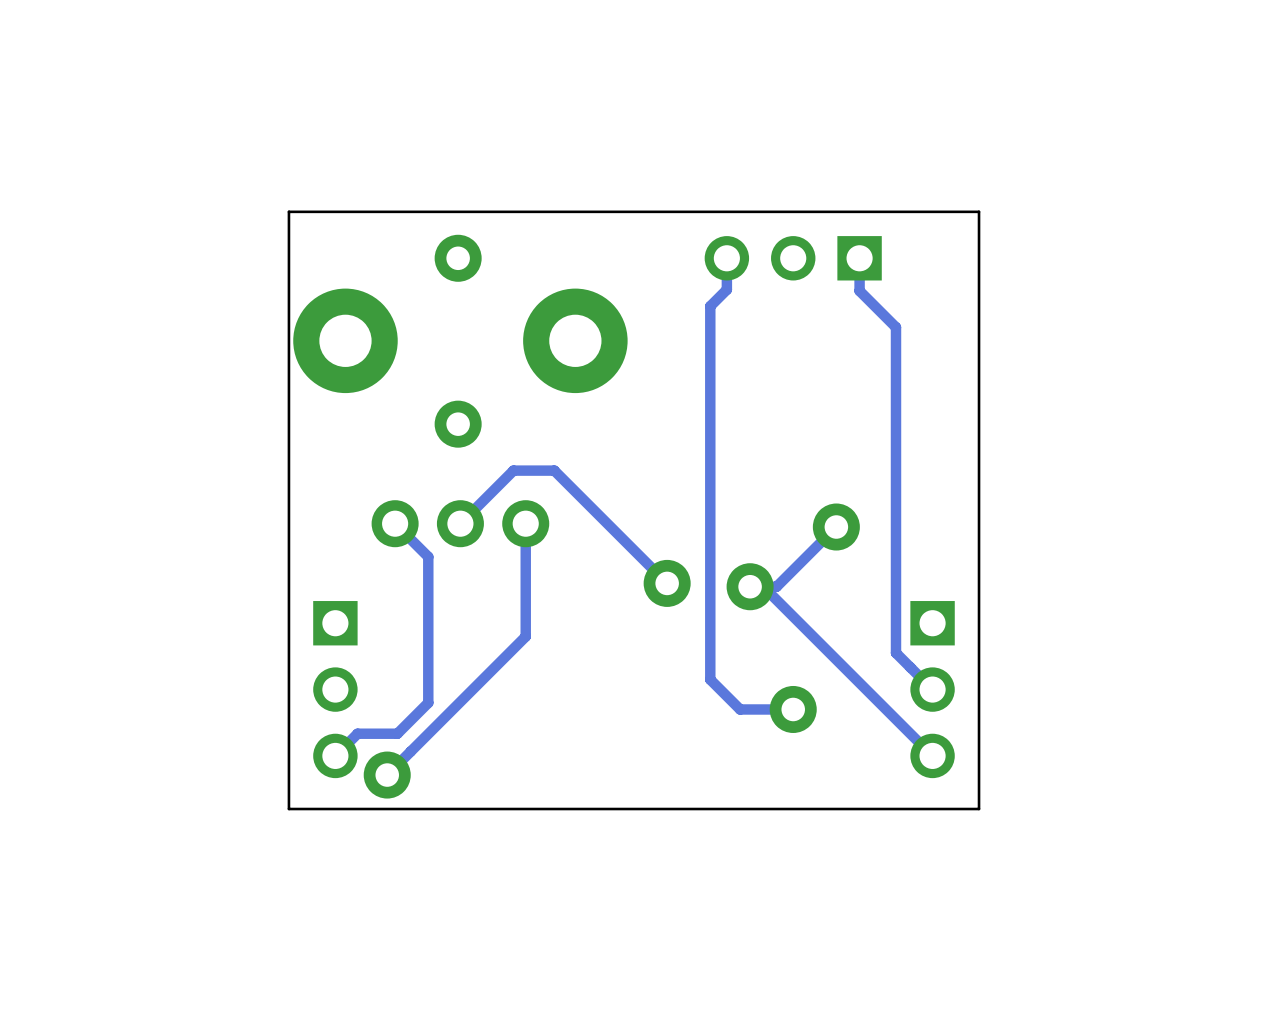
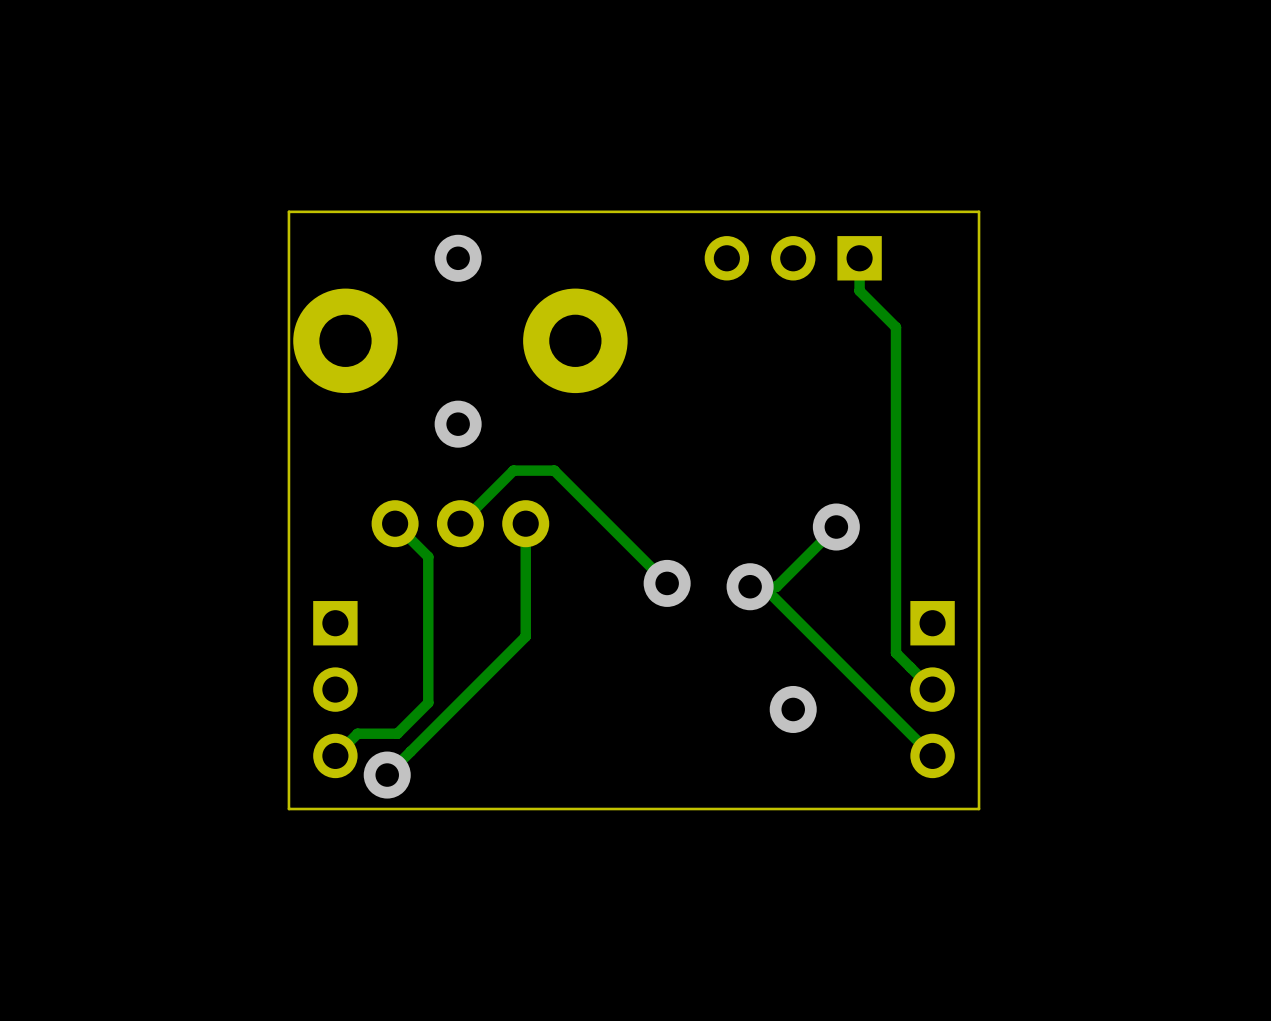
track: (726, 258) (726, 289) (710, 306) (710, 679) (740, 709) (793, 709) -> none

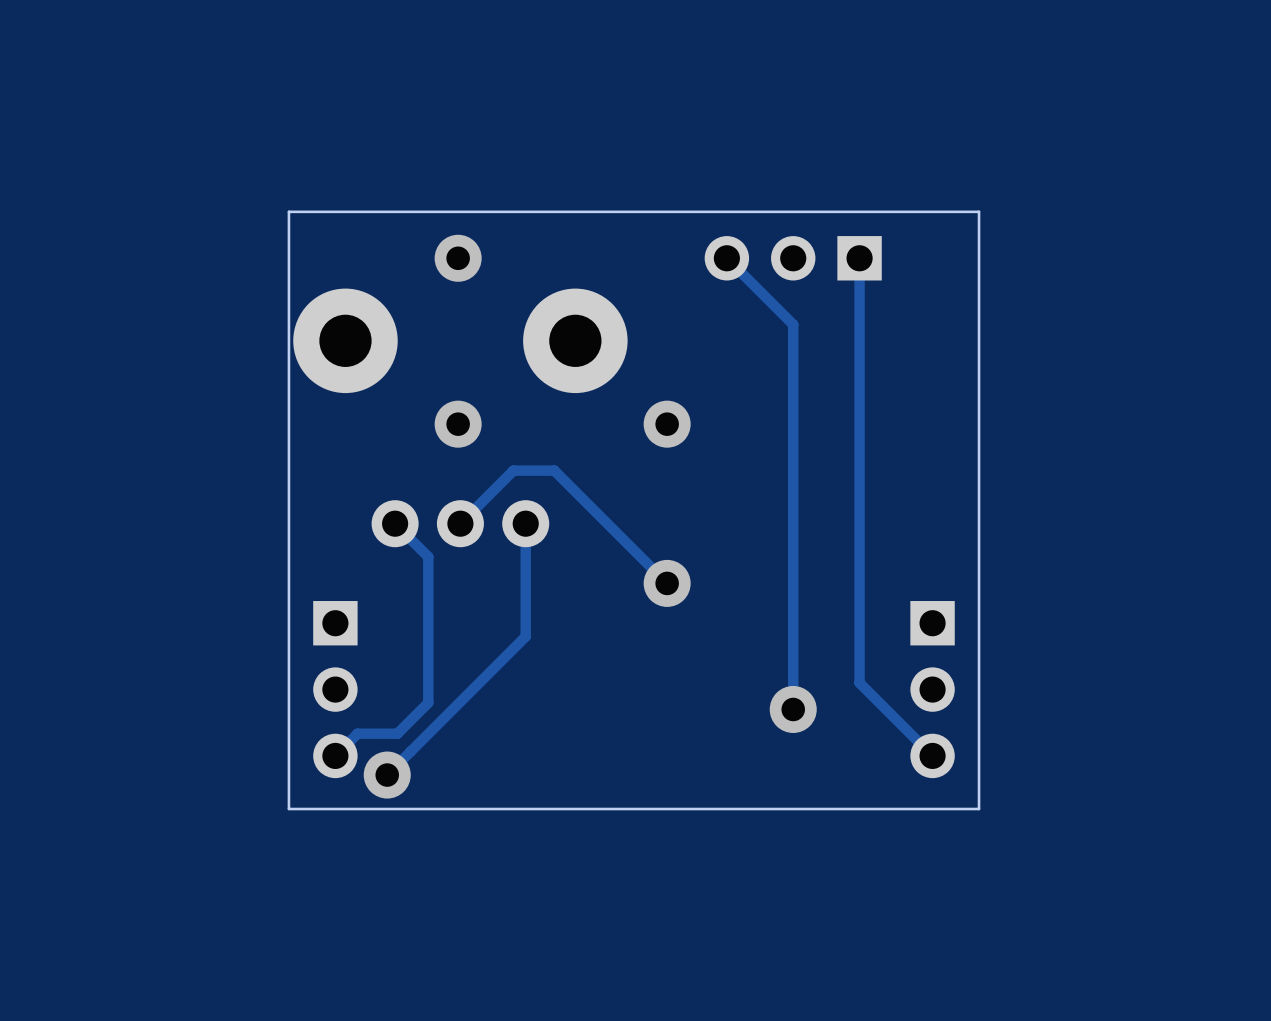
track: none -> (726, 258) (793, 324) (793, 709)
track: (859, 290) (896, 327) (896, 653) (932, 689) -> (859, 290) (859, 682)
via: none -> (667, 424)
track: (836, 527) (776, 586) (750, 586) -> none
via: (836, 527) -> none
via: (750, 586) -> none
track: (763, 586) (859, 682) -> none

